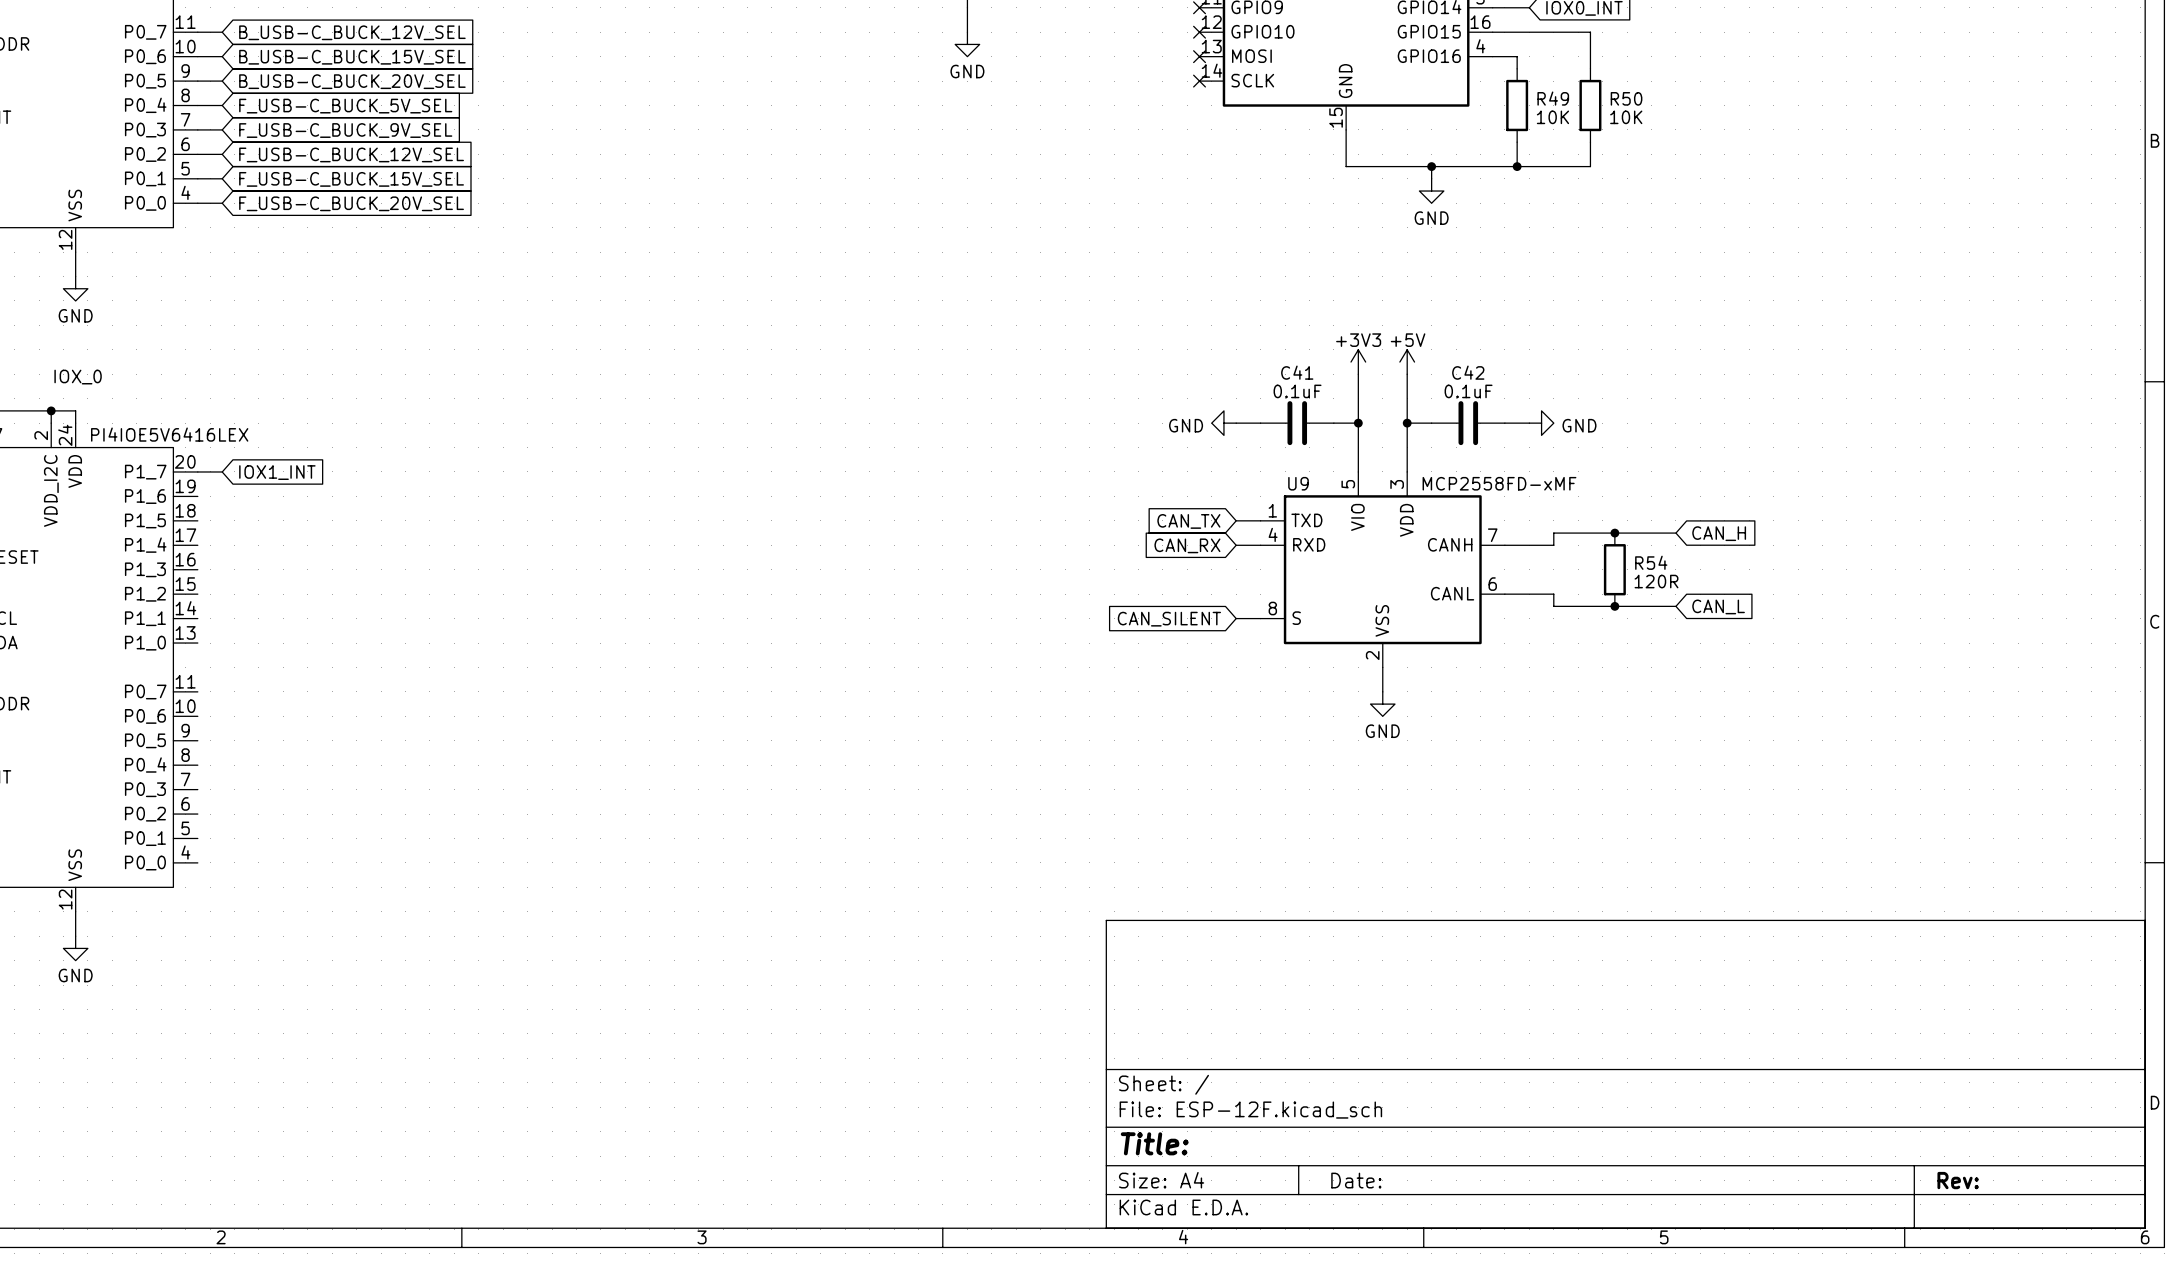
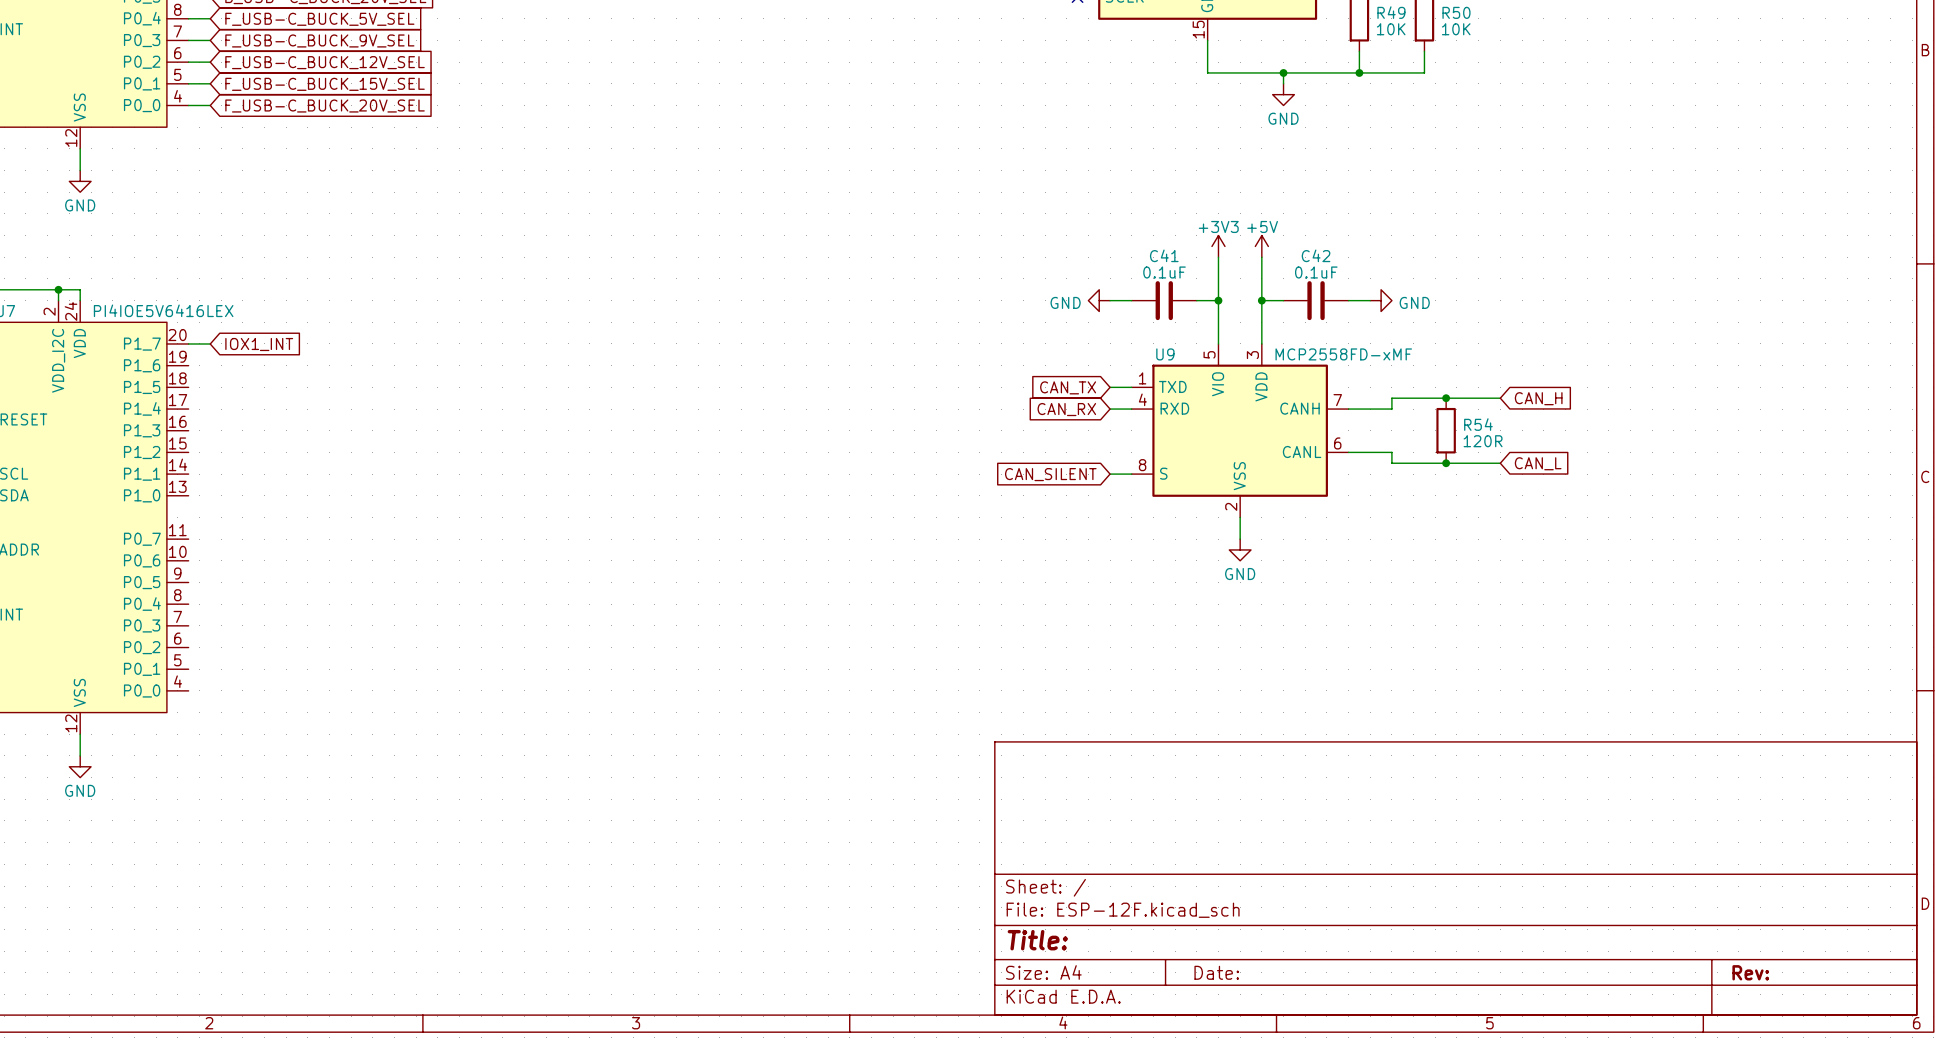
text: IOX_0 (78, 377) -> none

